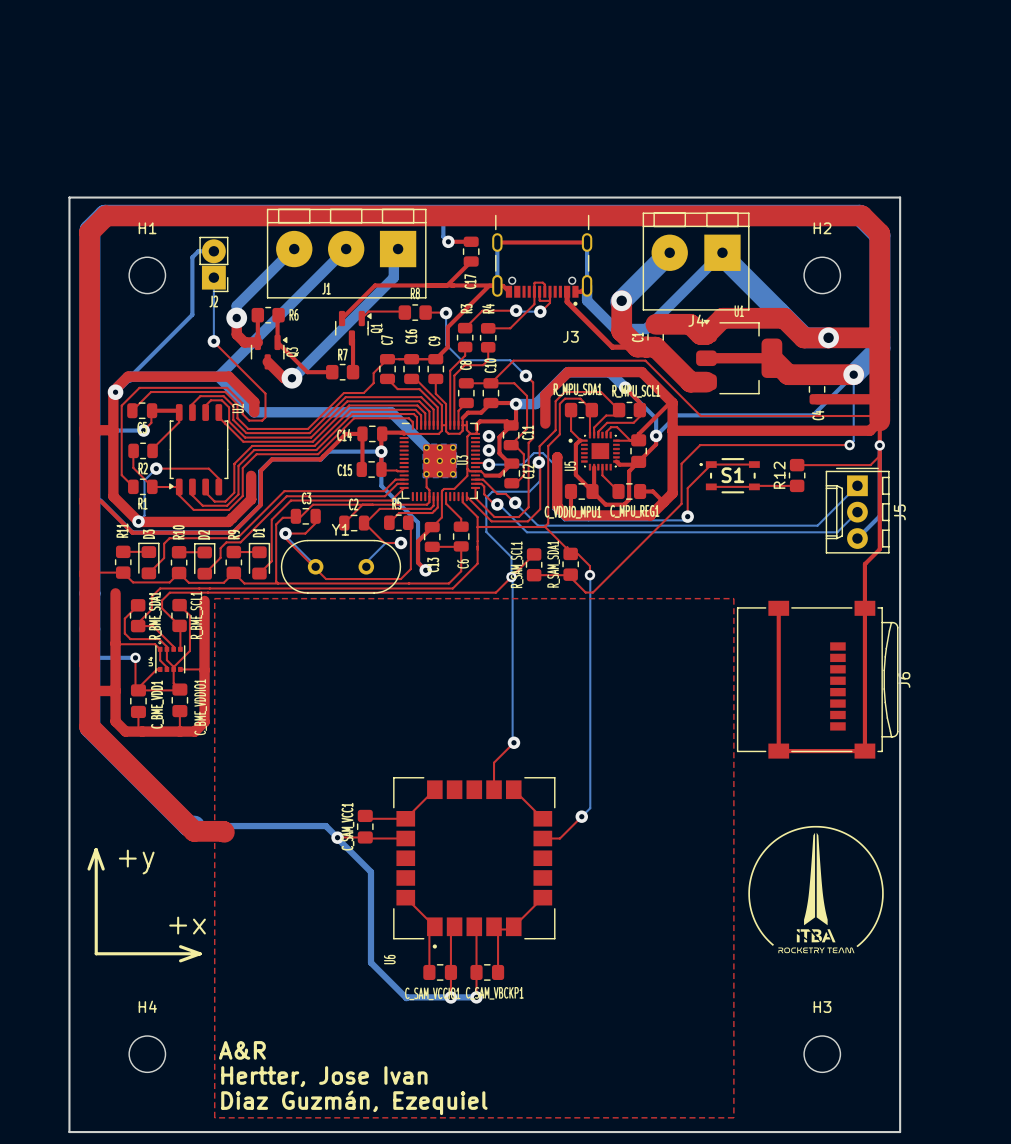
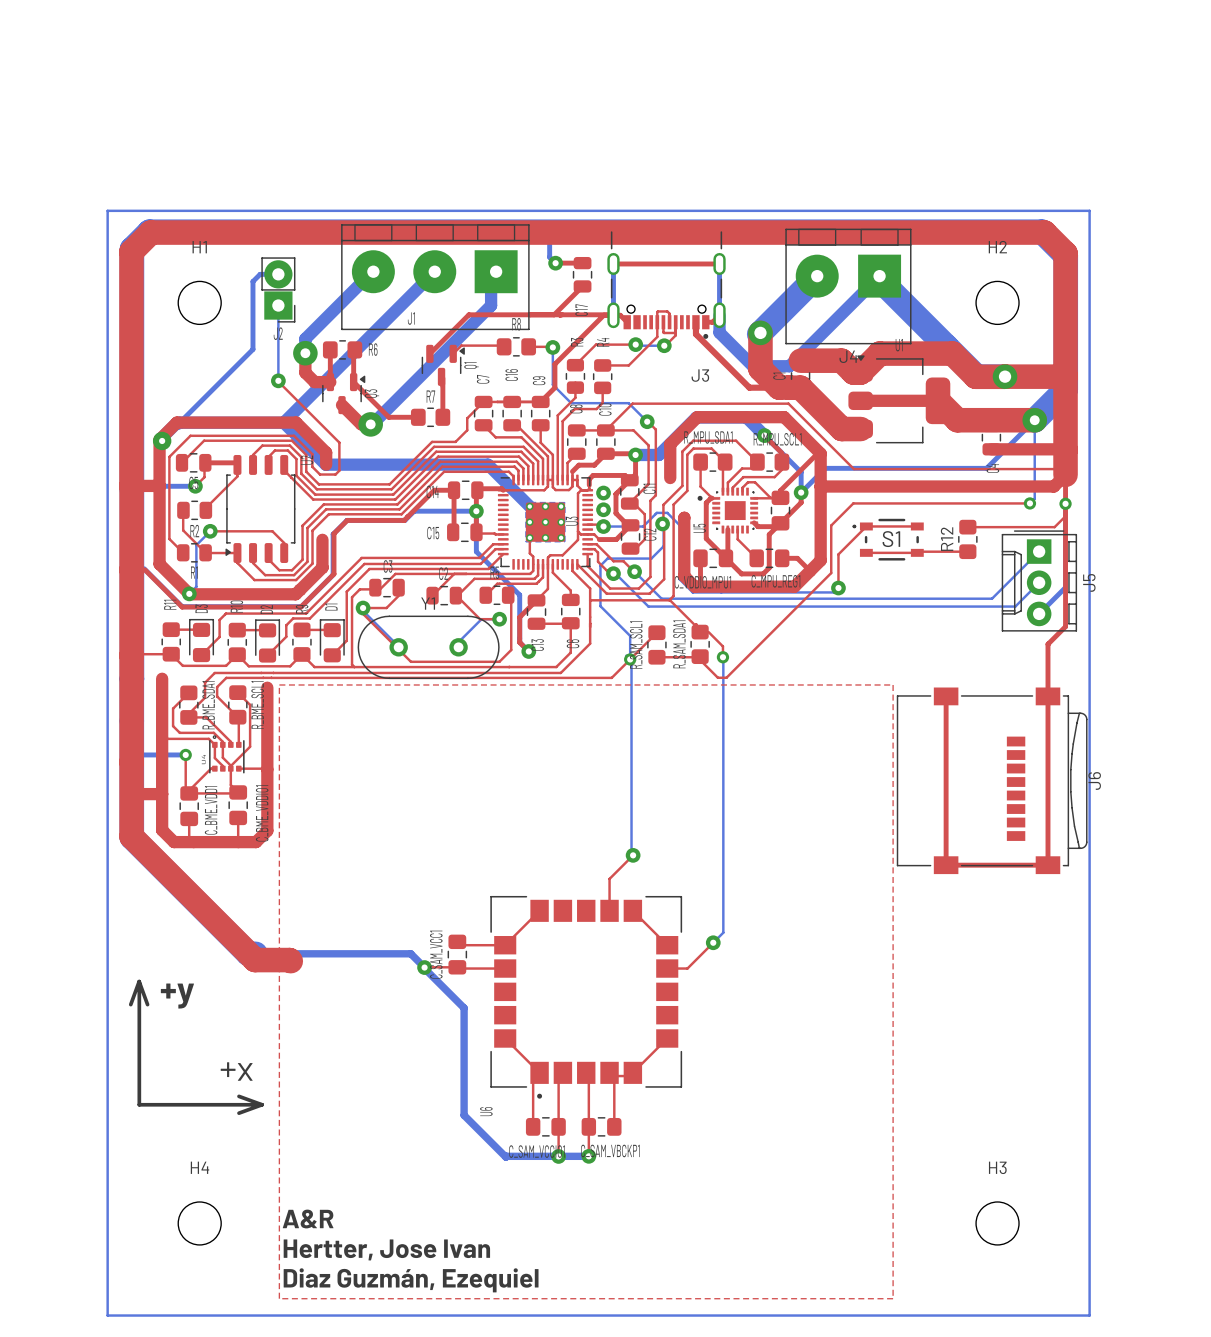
board edge: (69, 197) (900, 197) (900, 1132) (69, 1132) (69, 197) -> none
bottom track: none -> (107, 210) (1089, 210) (1089, 1315) (107, 1315) (107, 210)
drawing: [748, 825, 884, 954] -> none

